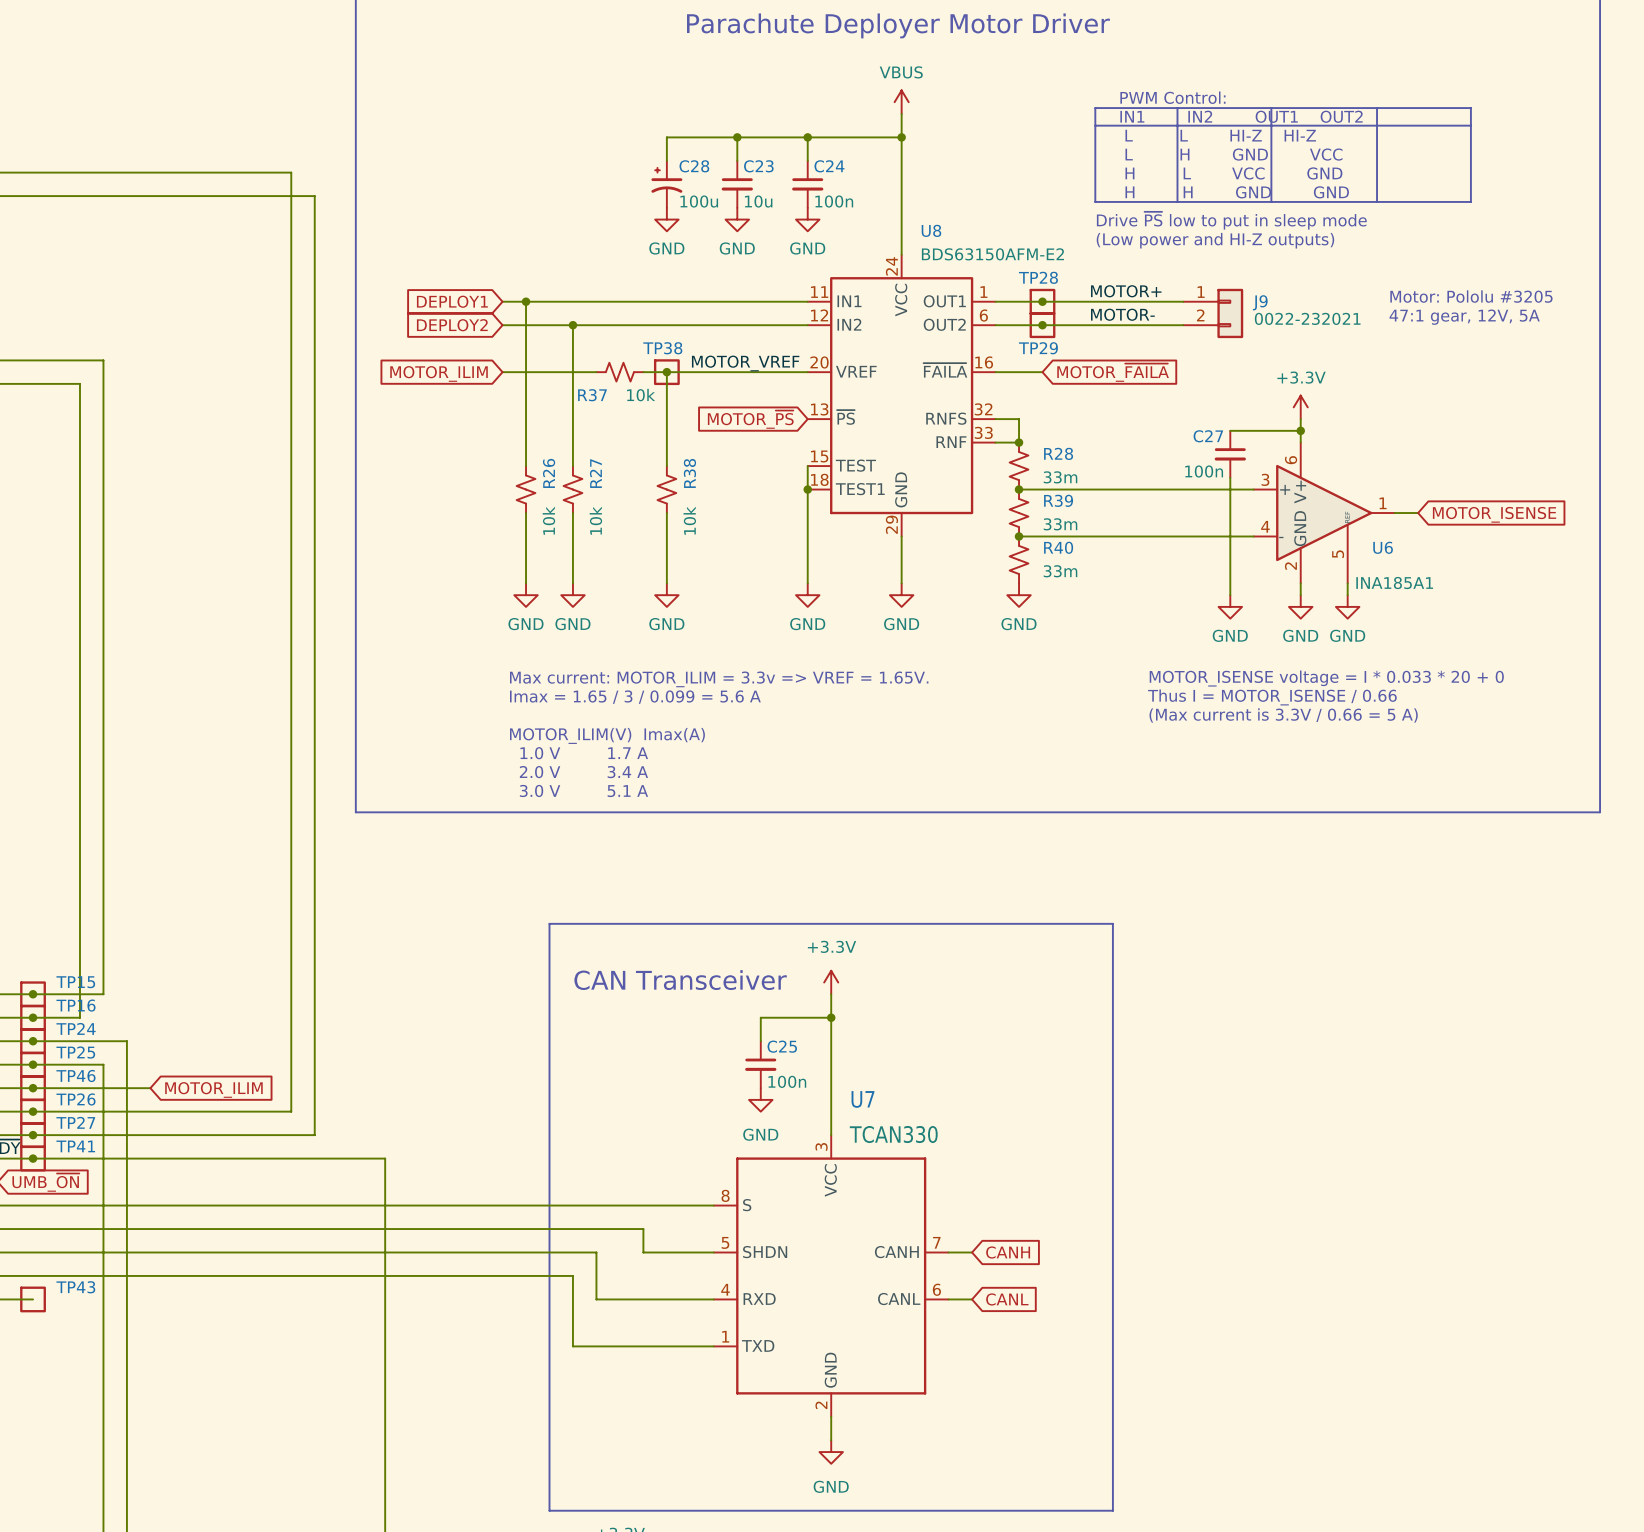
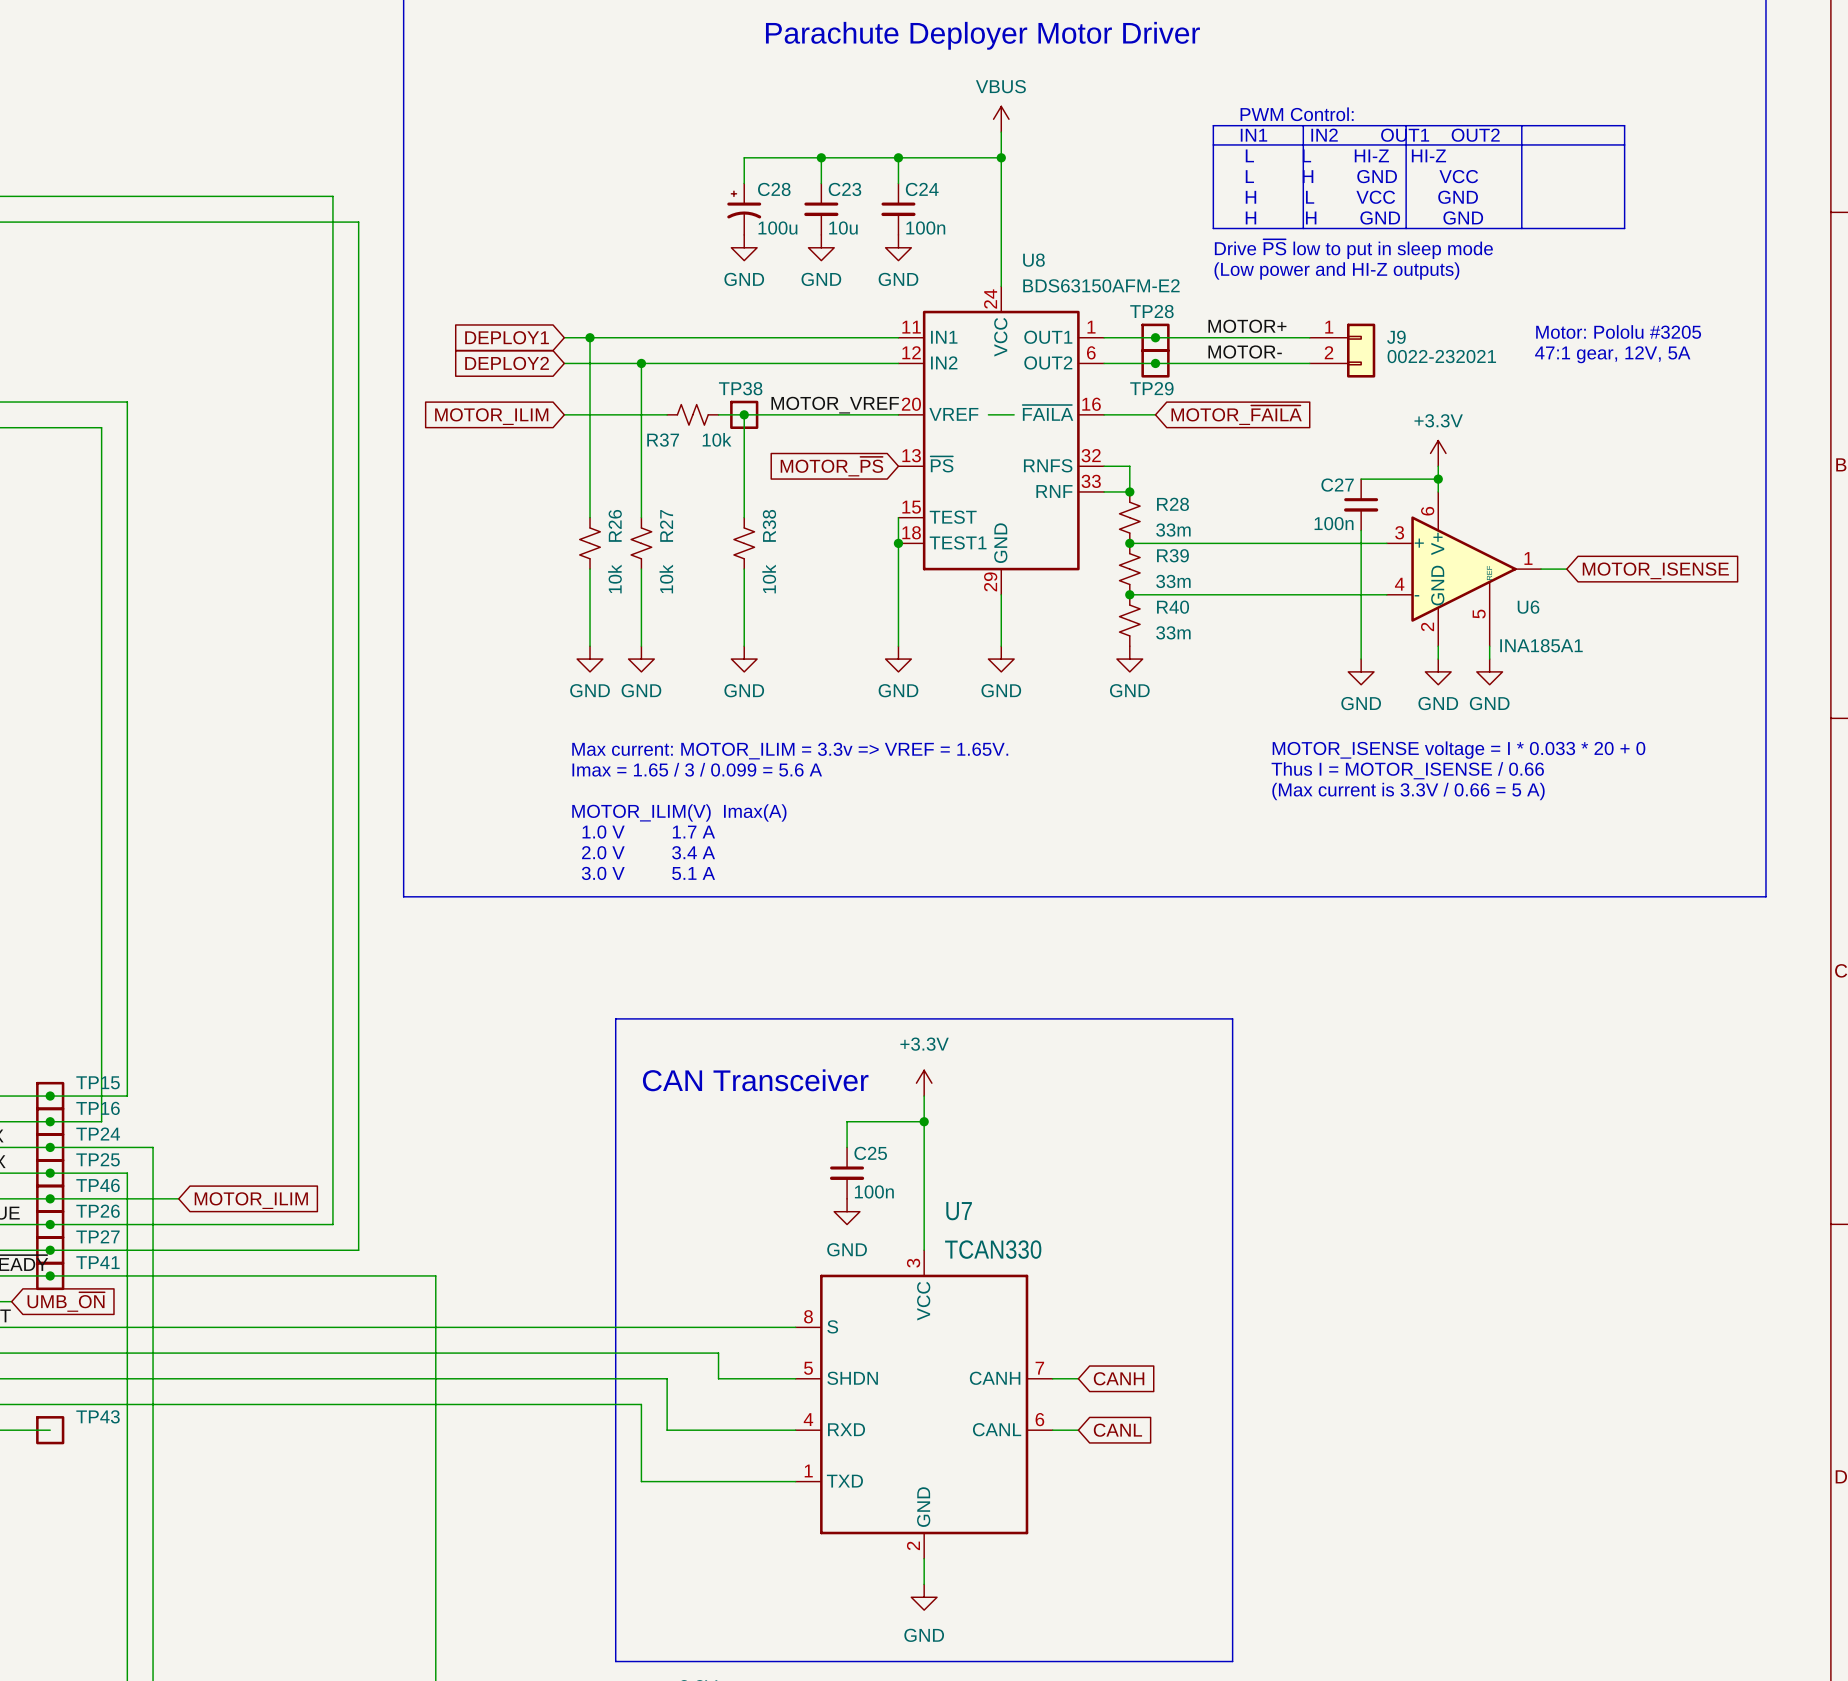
wire: none -> (988, 414) (1014, 414)

